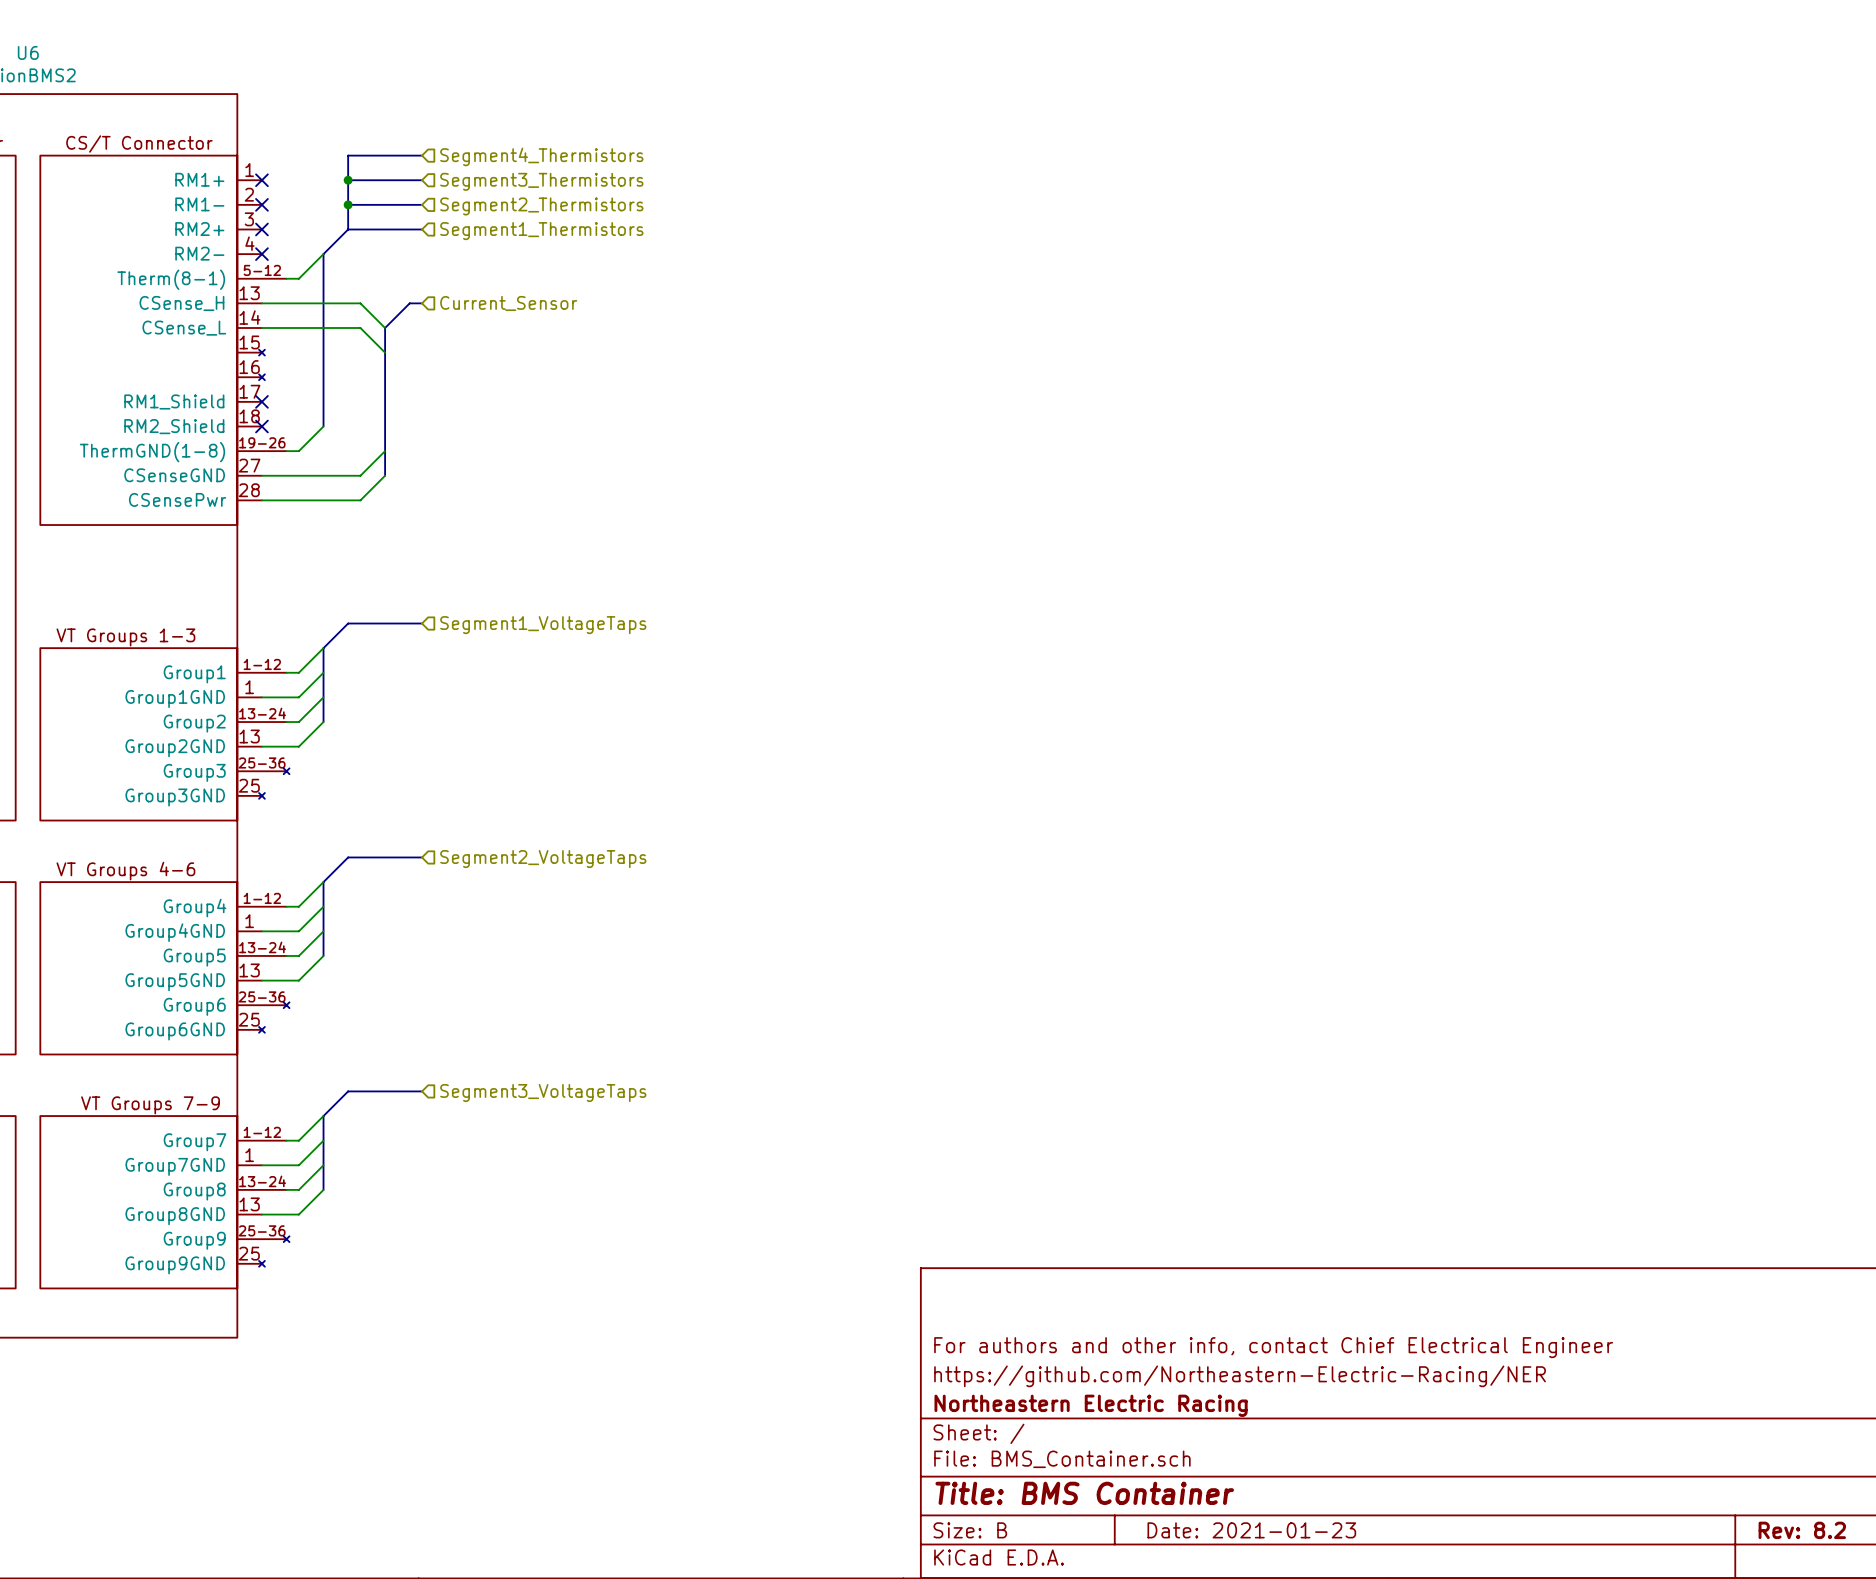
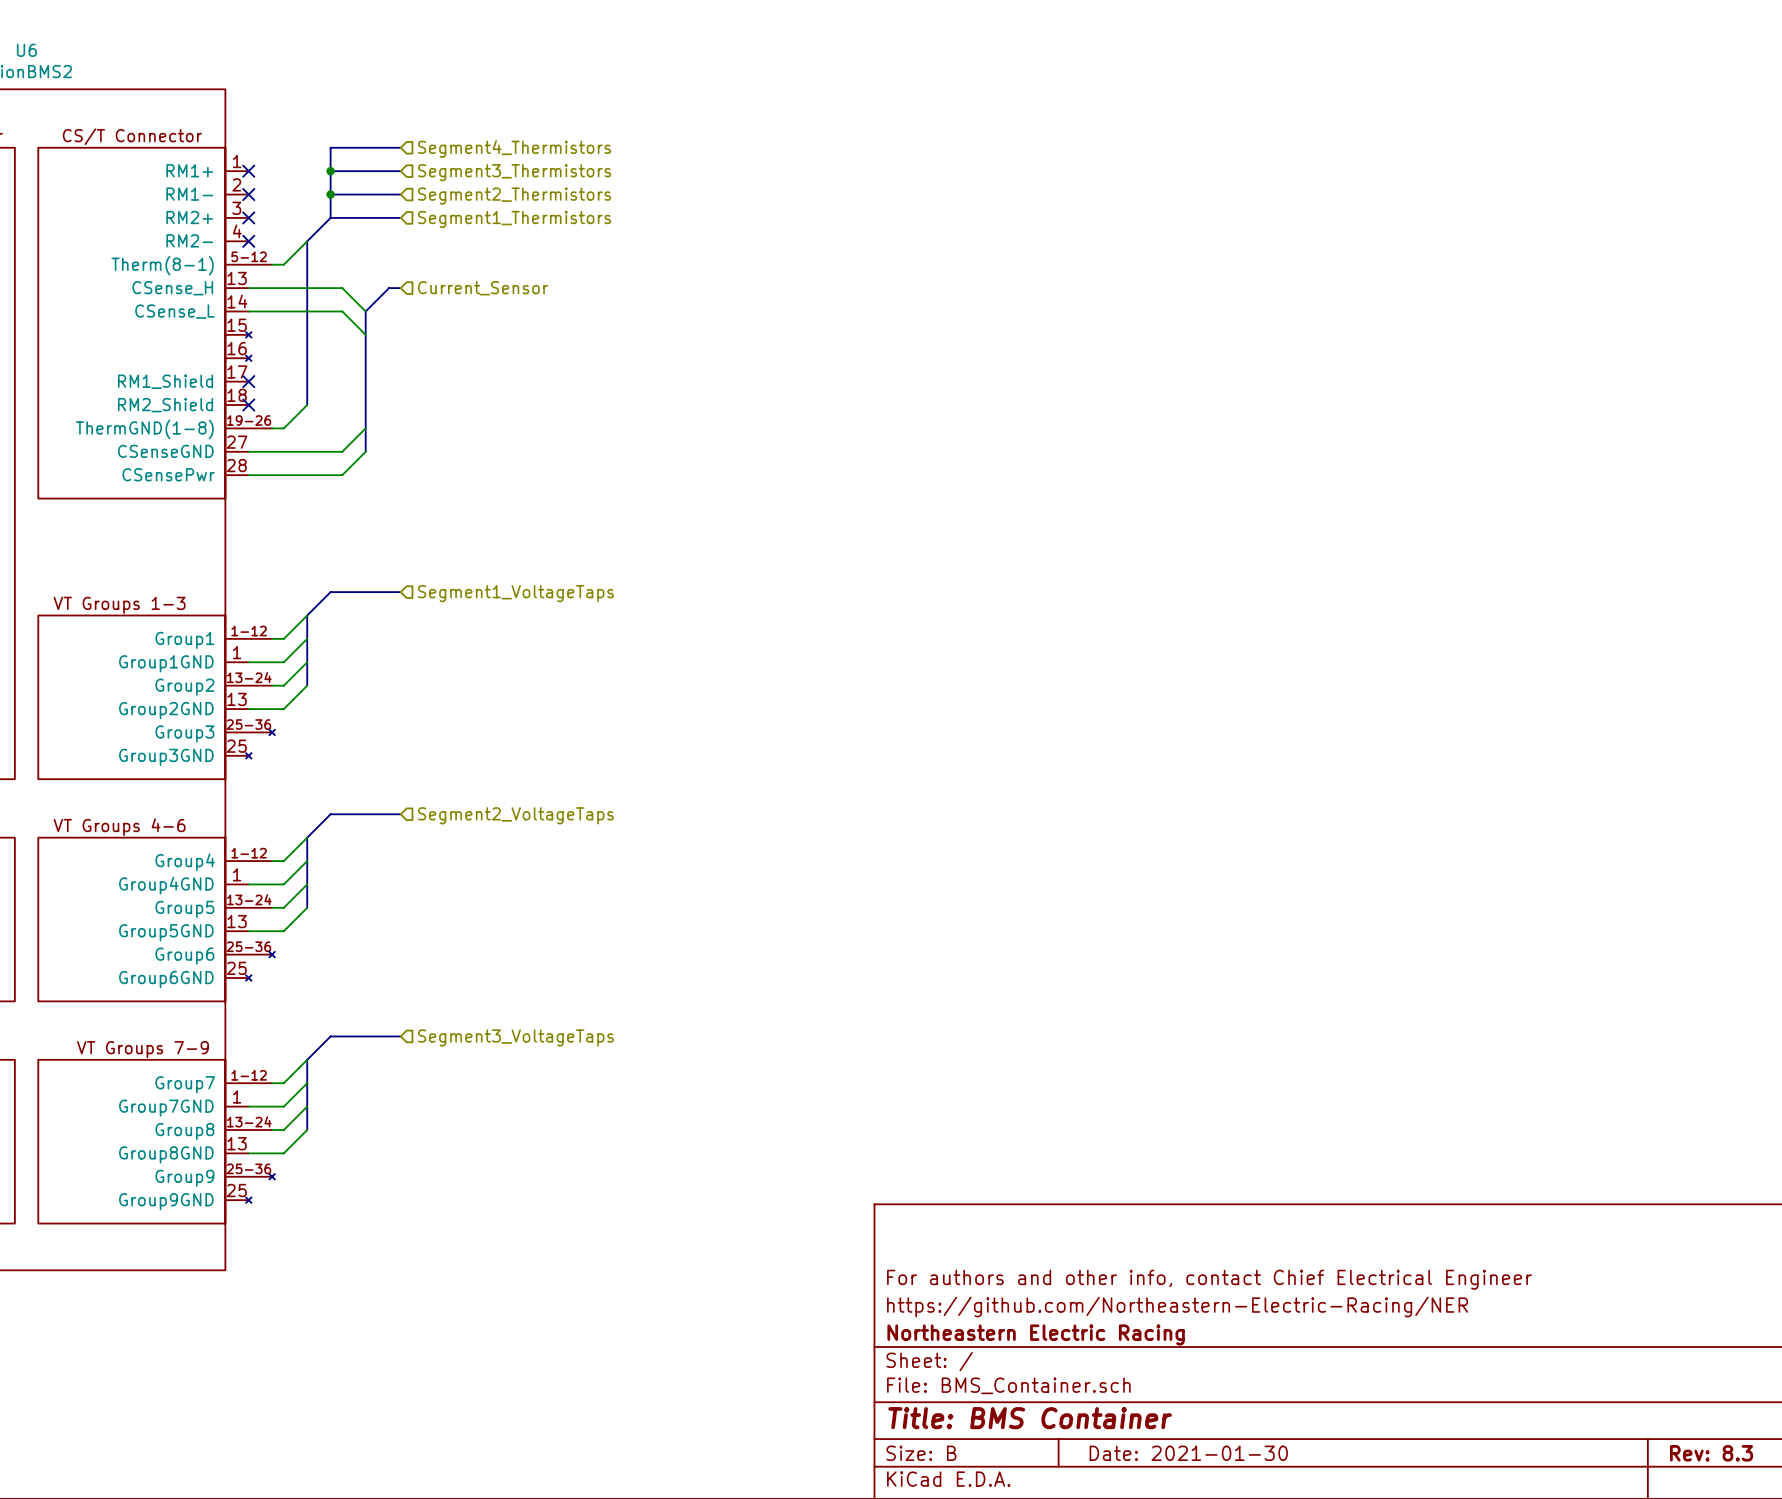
title block: Date: 2021-01-23 (1251, 1530) -> Date: 2021-01-30 (1188, 1453)
title block: Rev: 8.2 (1802, 1530) -> Rev: 8.3 (1711, 1453)

